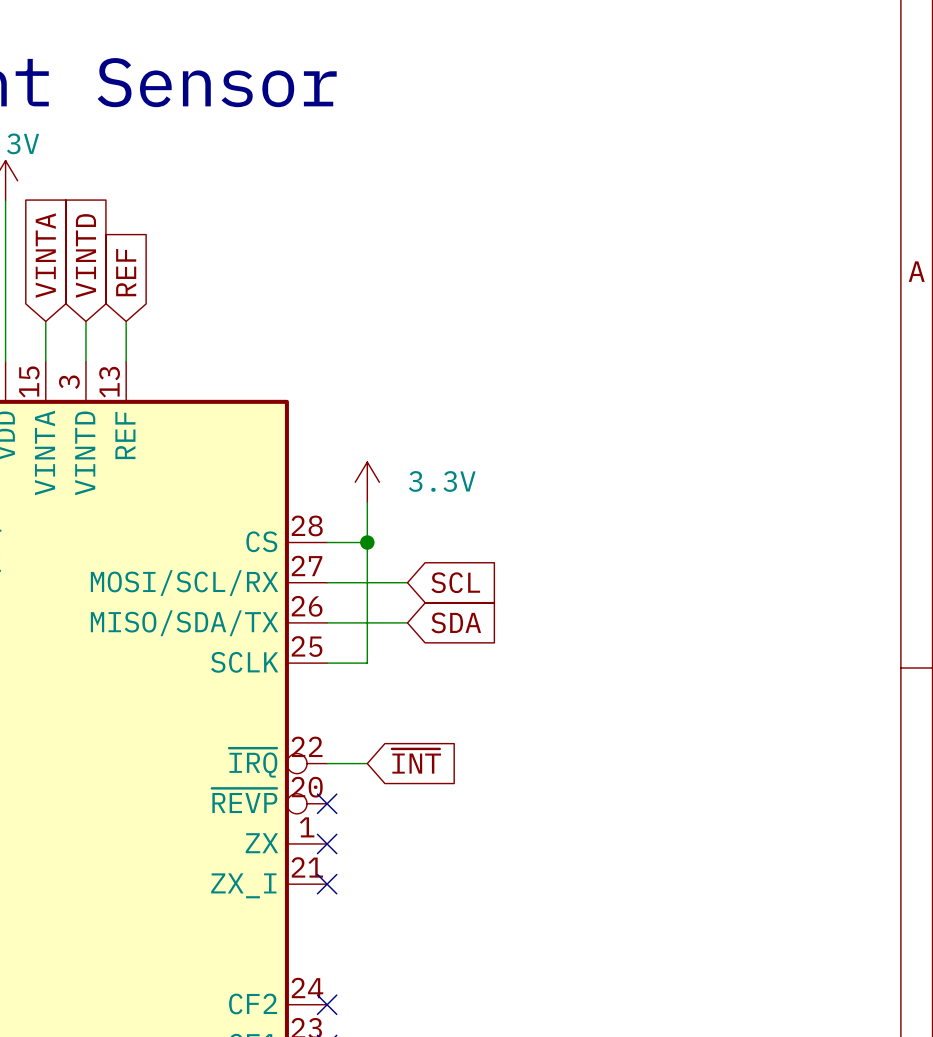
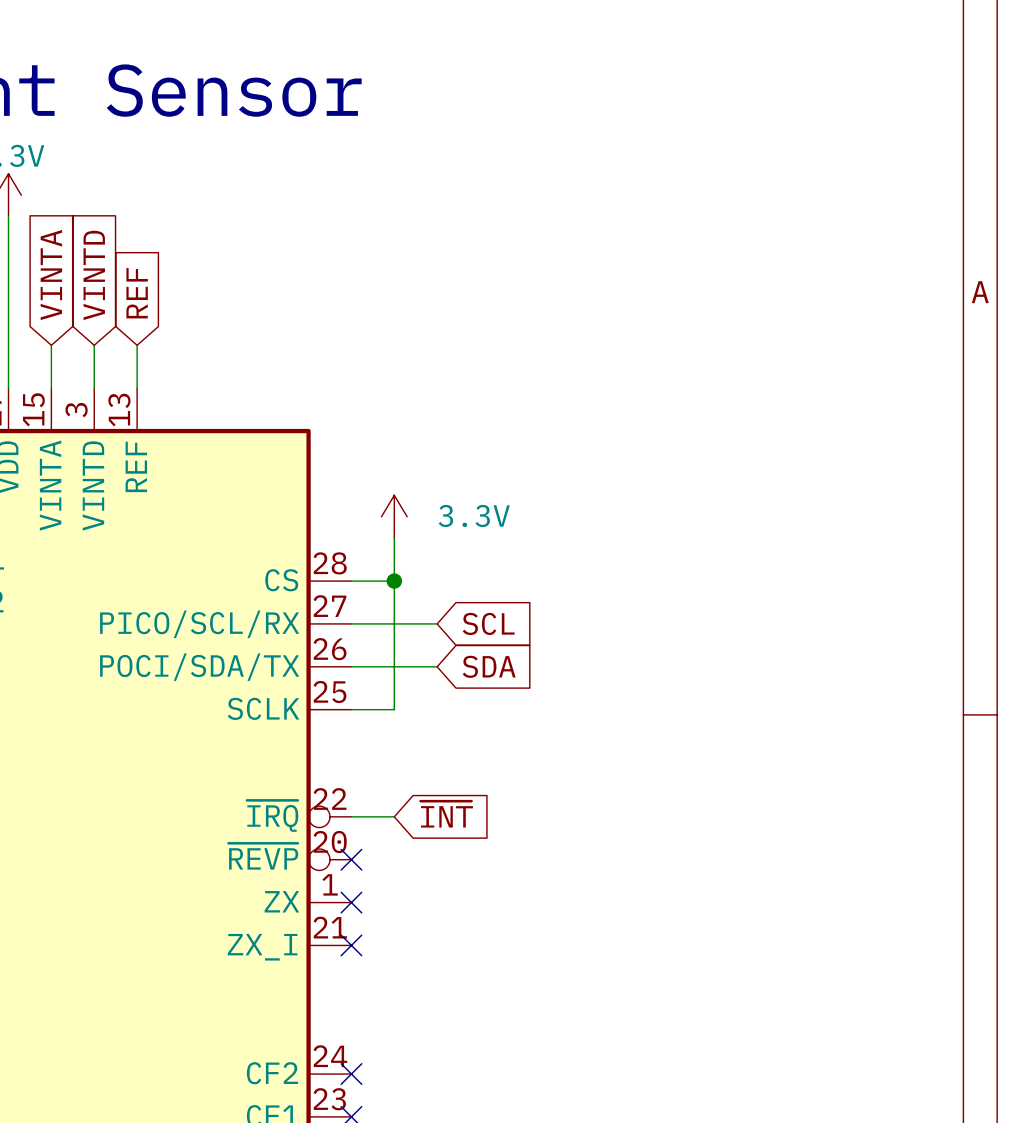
part pin name: MOSI/SCL/RX (184, 583) -> PICO/SCL/RX (199, 624)
part pin name: MISO/SDA/TX (184, 623) -> POCI/SDA/TX (199, 667)

